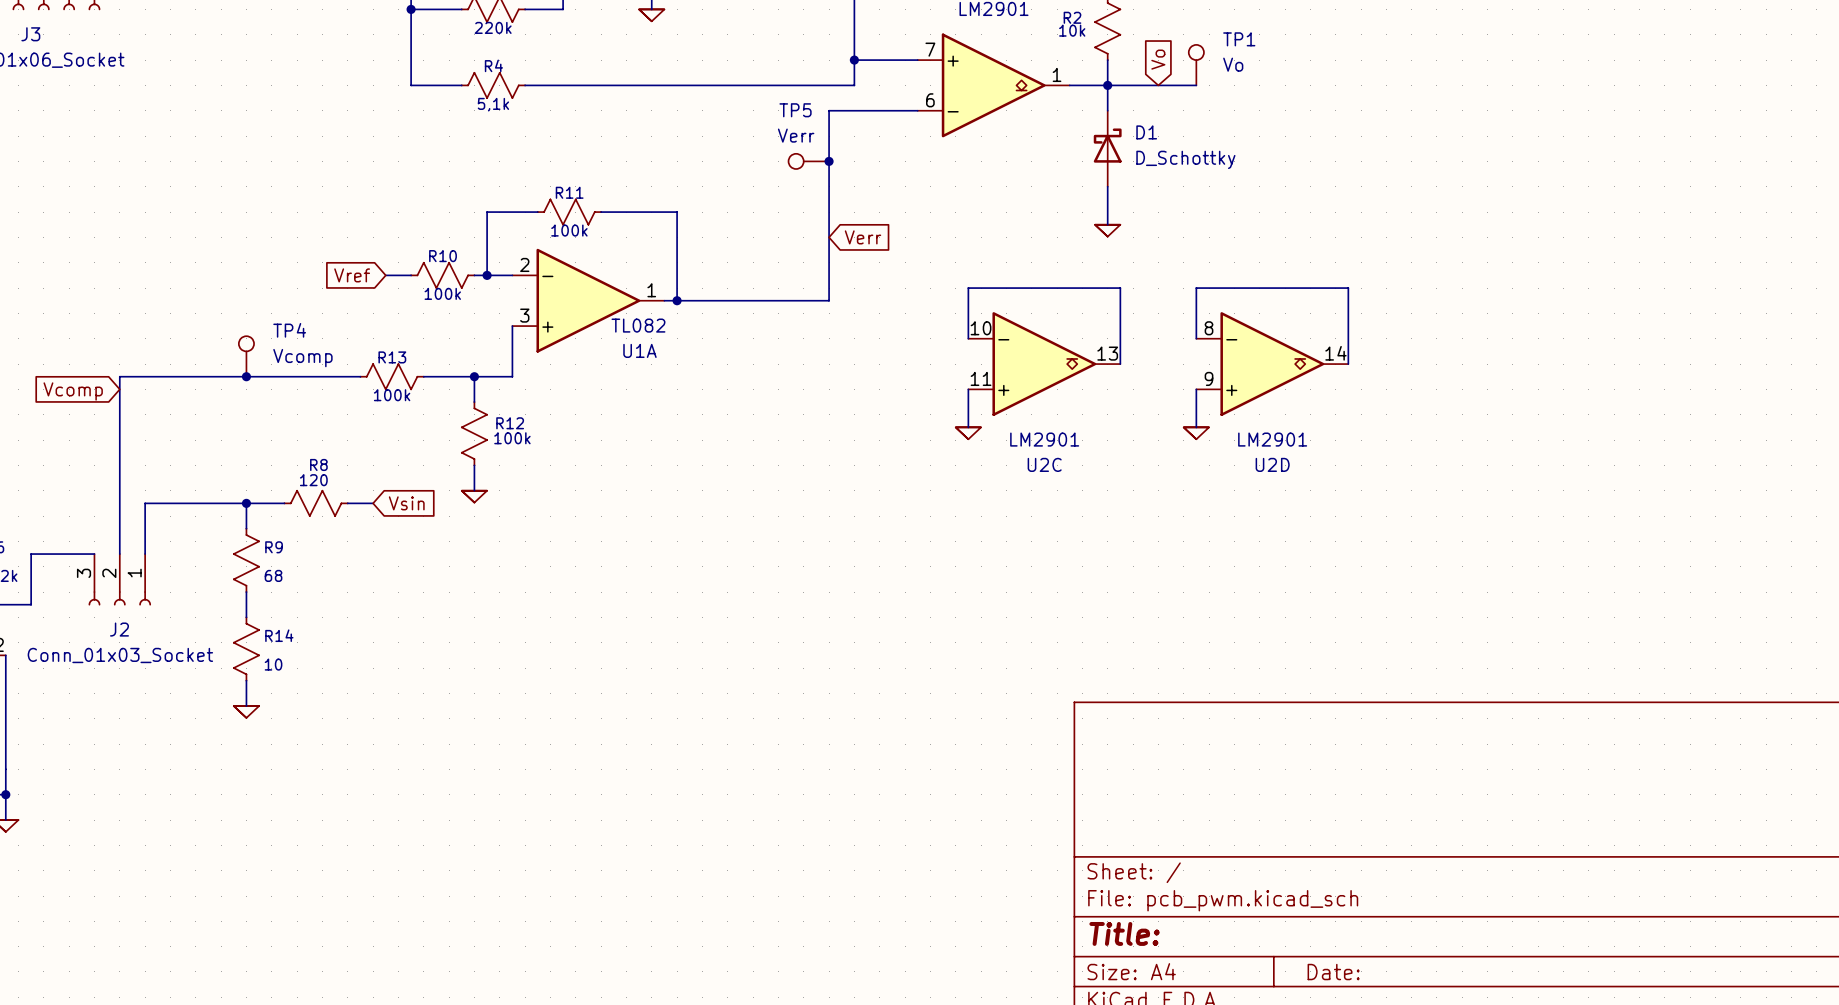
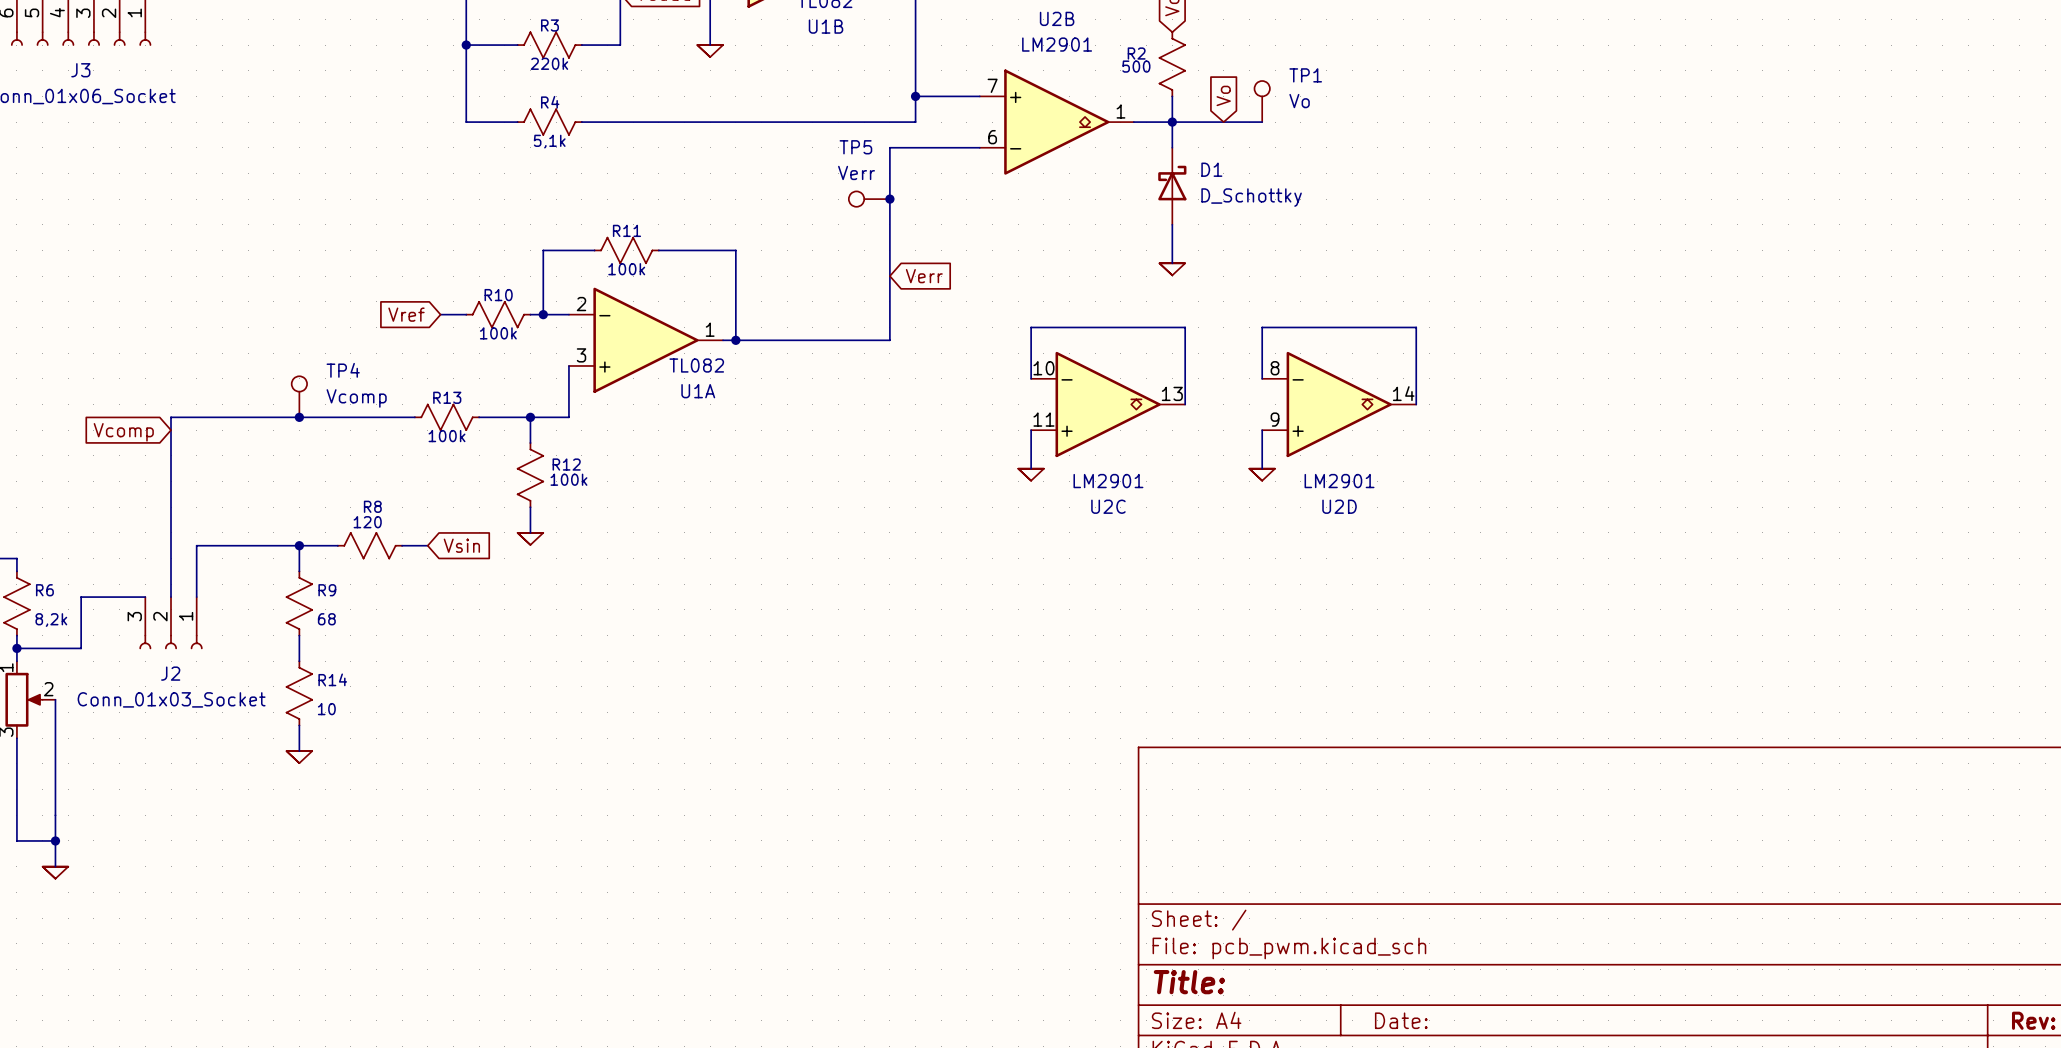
R2 value: 10k (1072, 30) -> 500 (1136, 66)

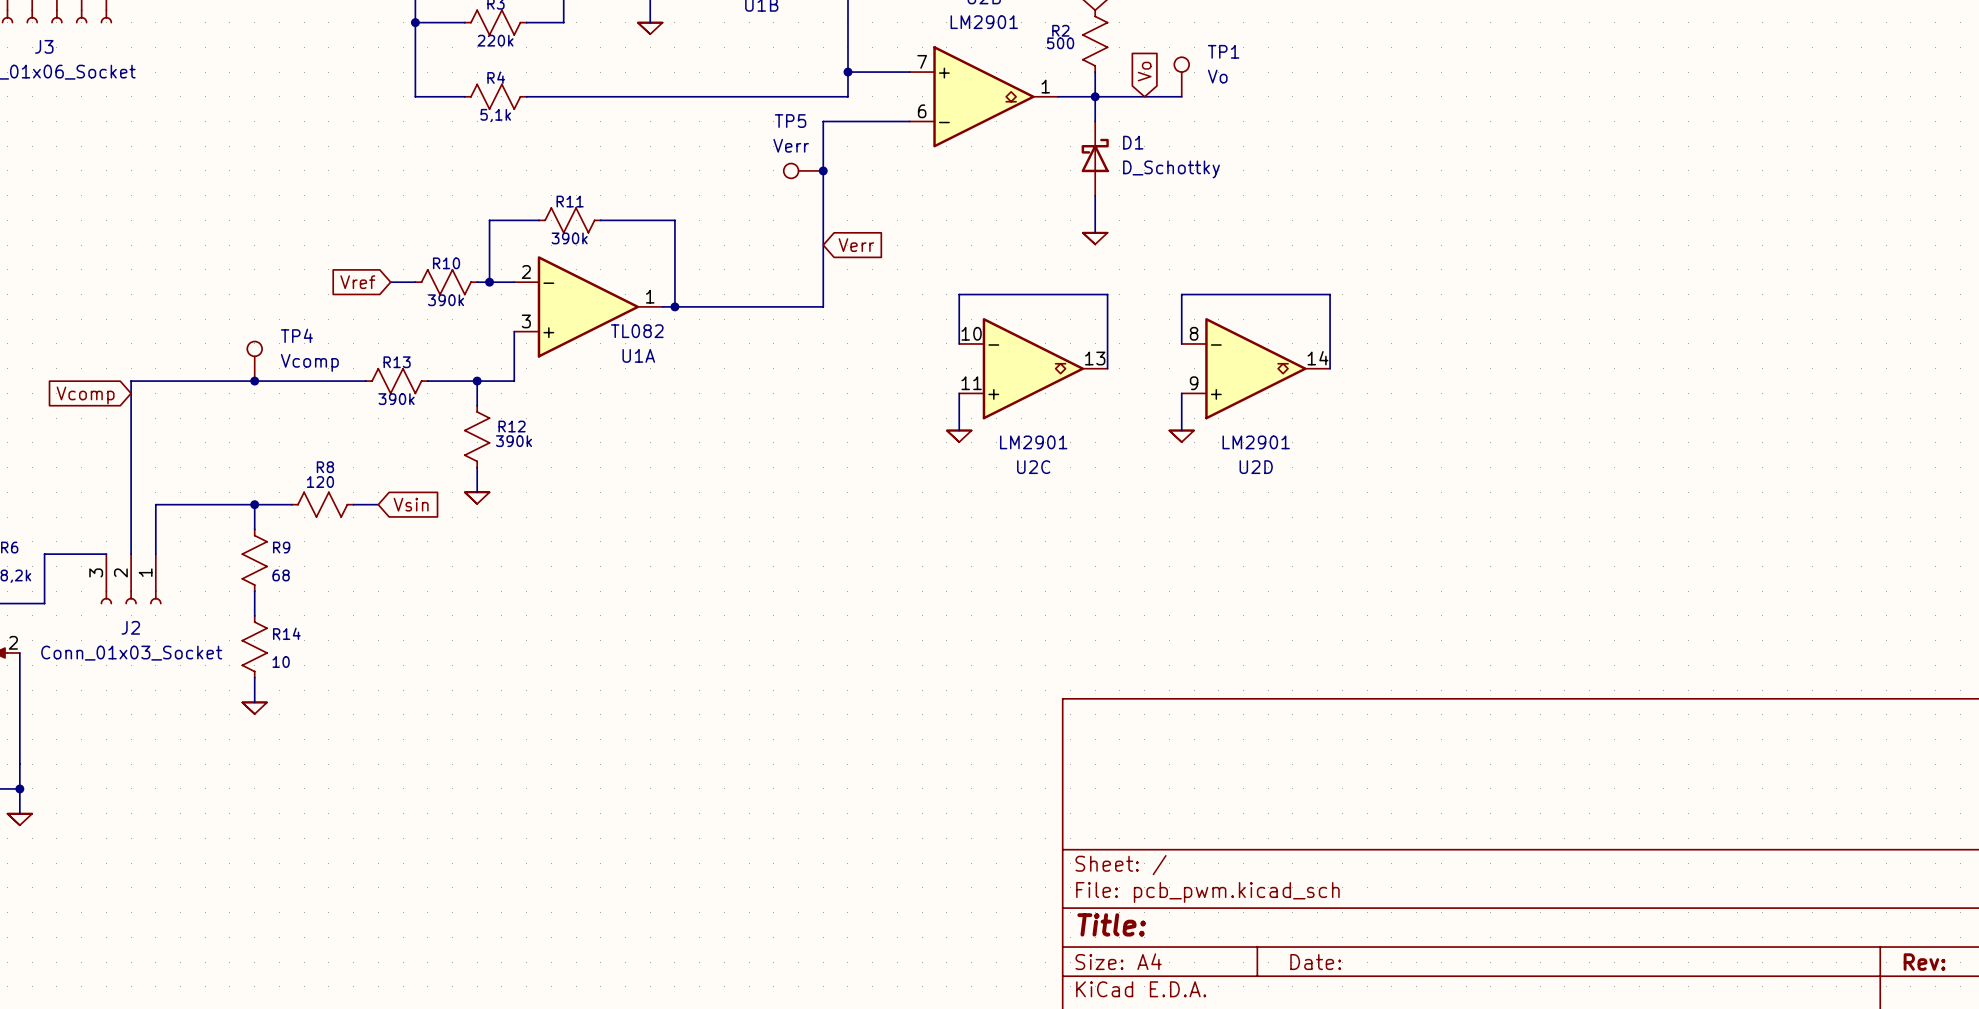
R11 value: 100k (626, 269) -> 390k (569, 238)
R10 value: 100k (498, 333) -> 390k (446, 300)
R13 value: 100k (447, 436) -> 390k (396, 399)
R12 value: 100k (568, 479) -> 390k (514, 441)

